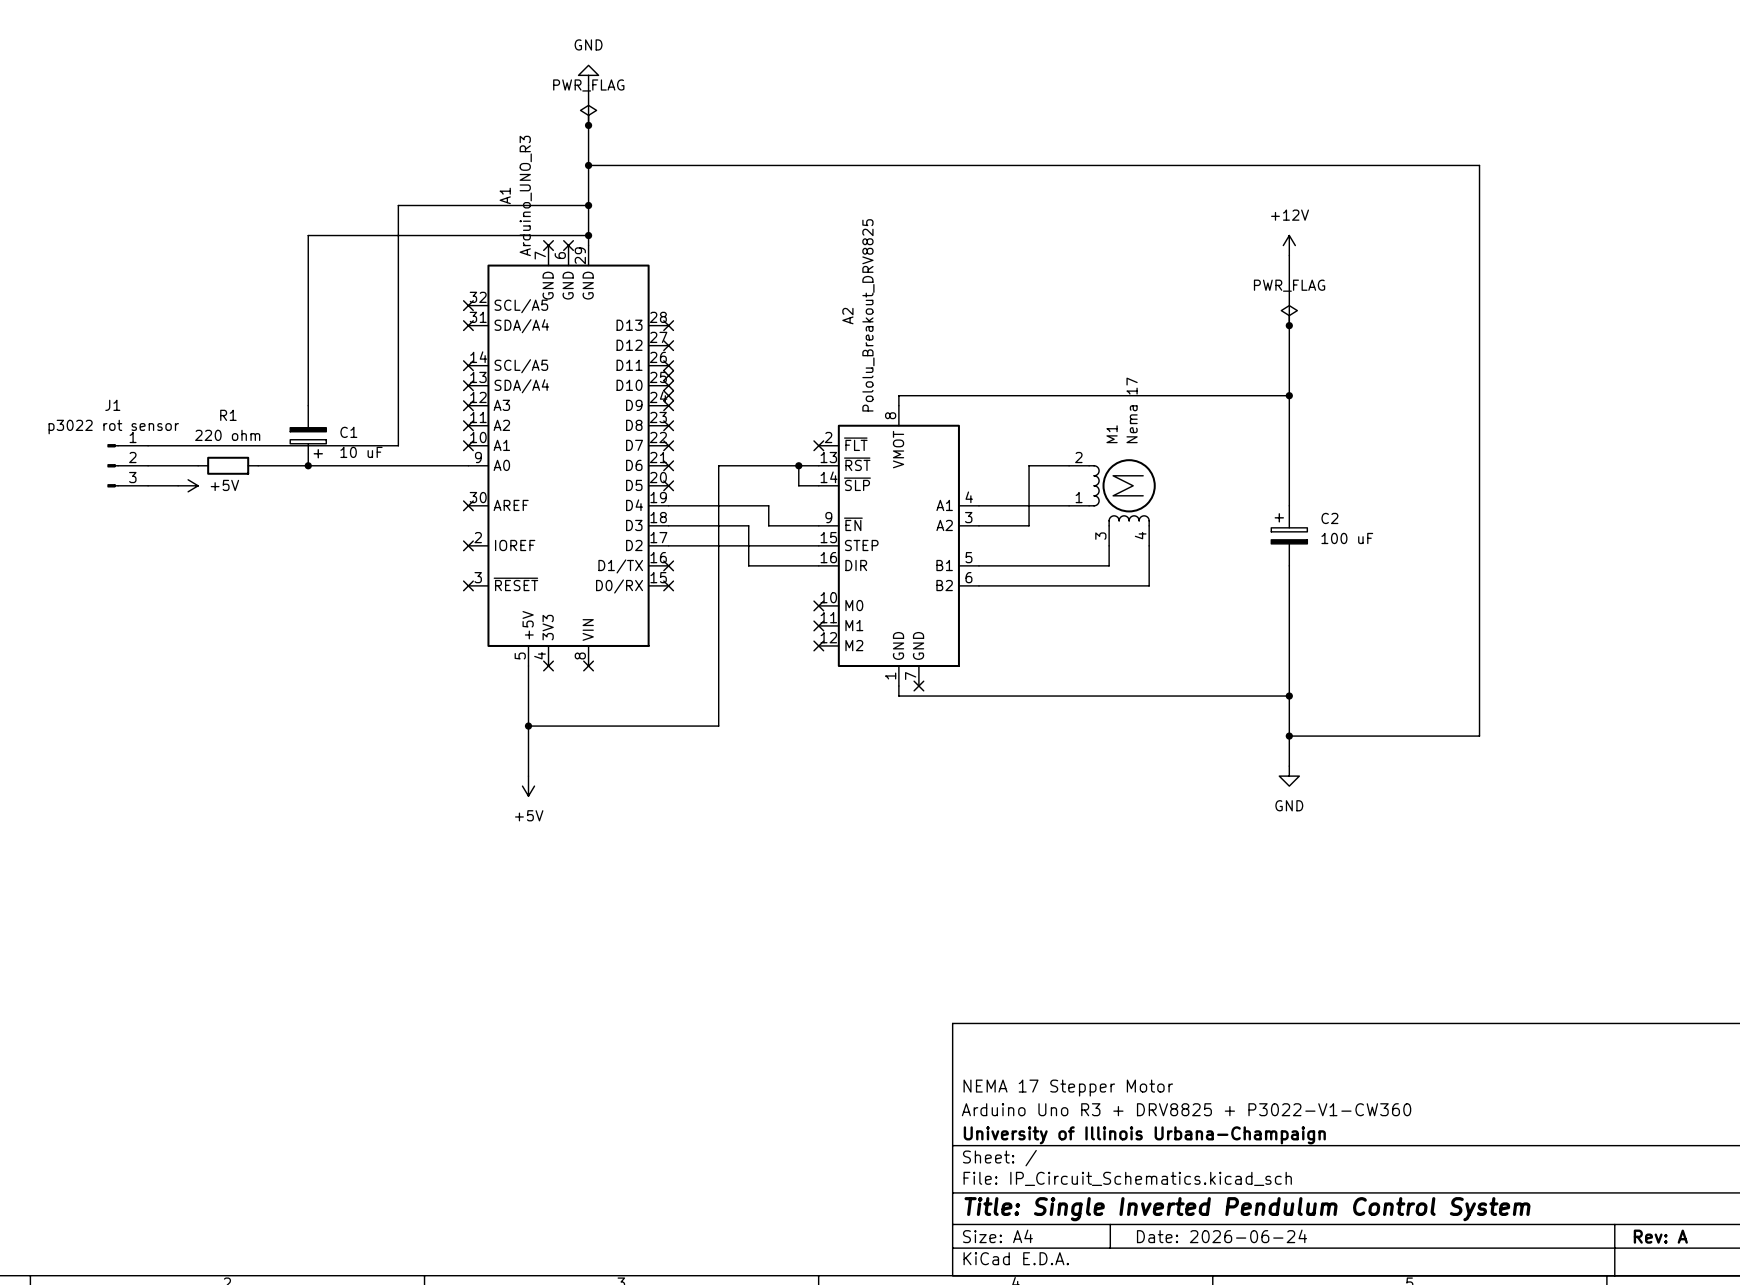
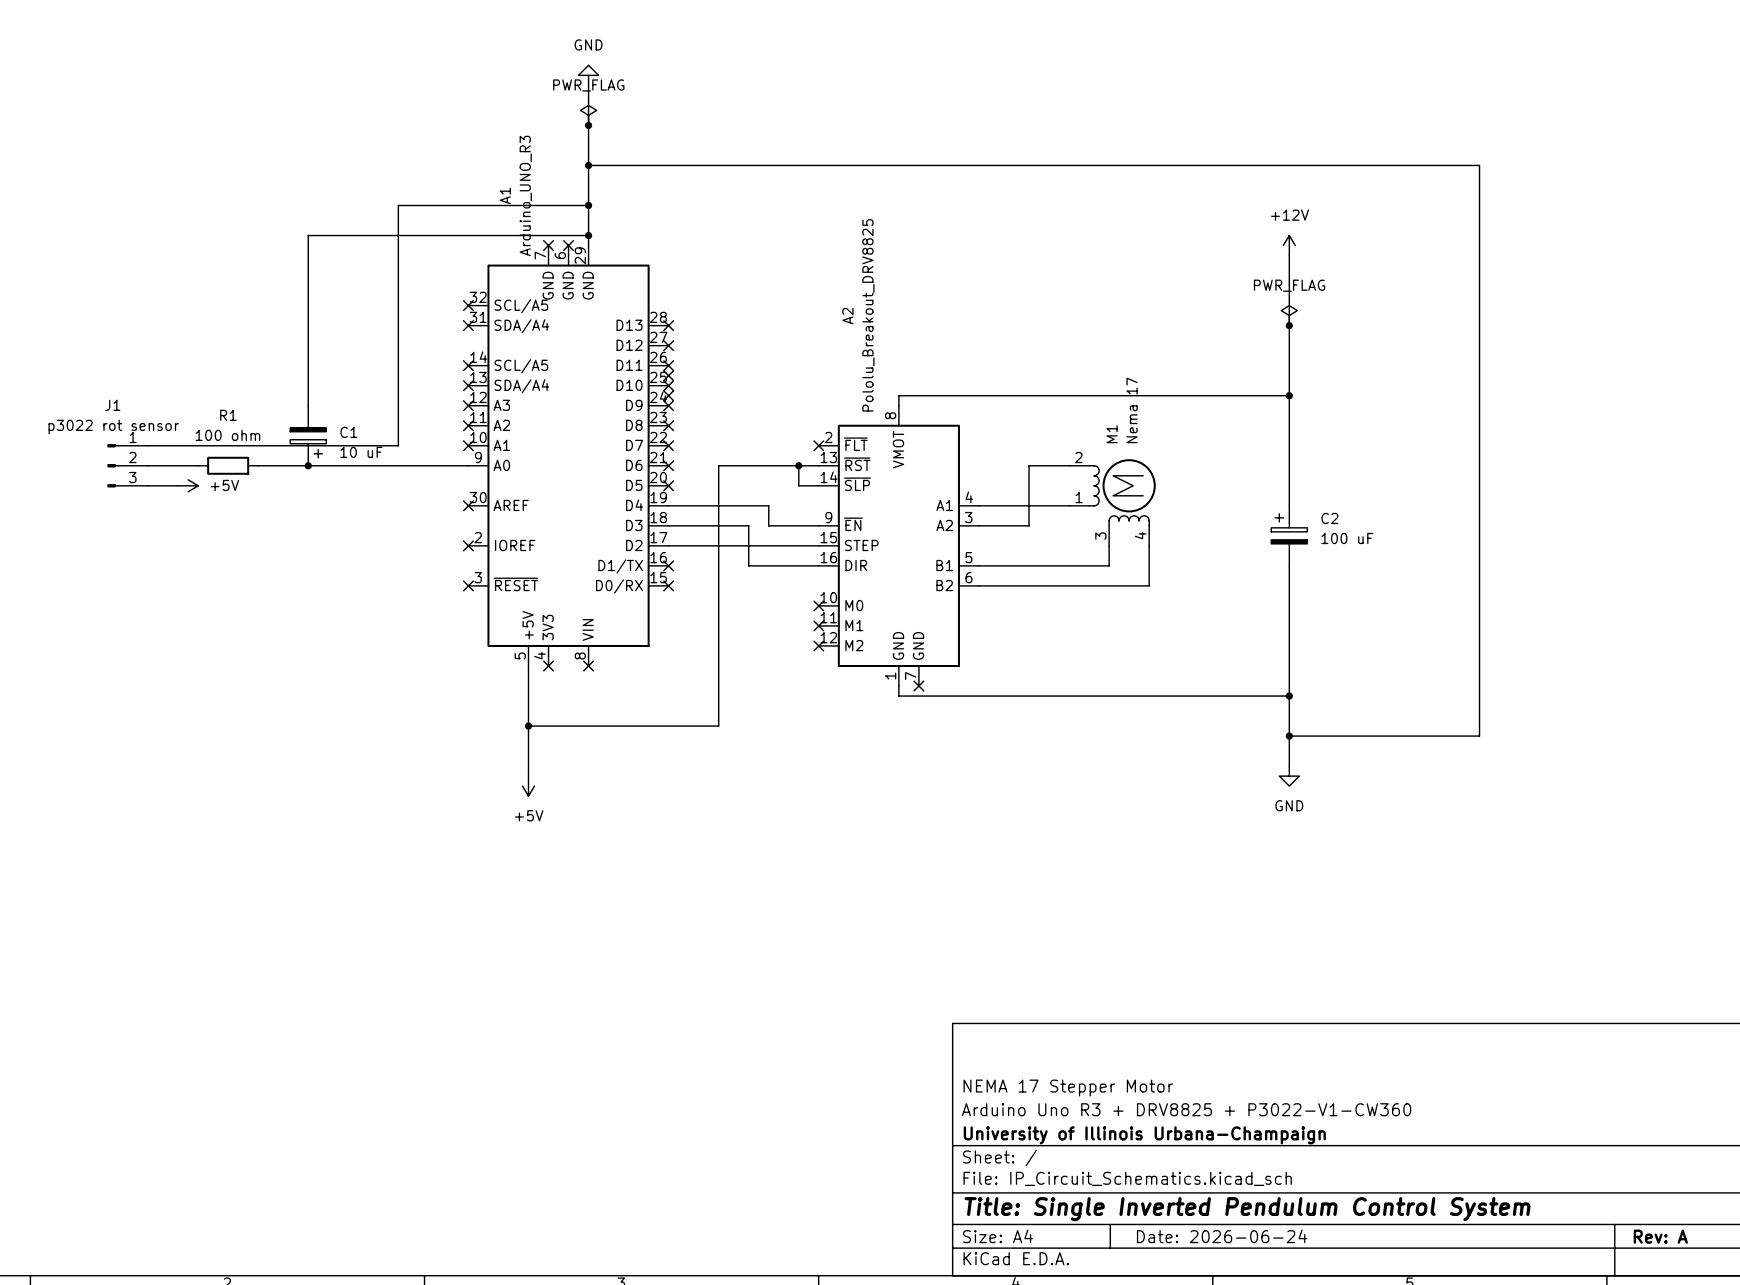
R1 value: 220 ohm (227, 435) -> 100 ohm (227, 435)

